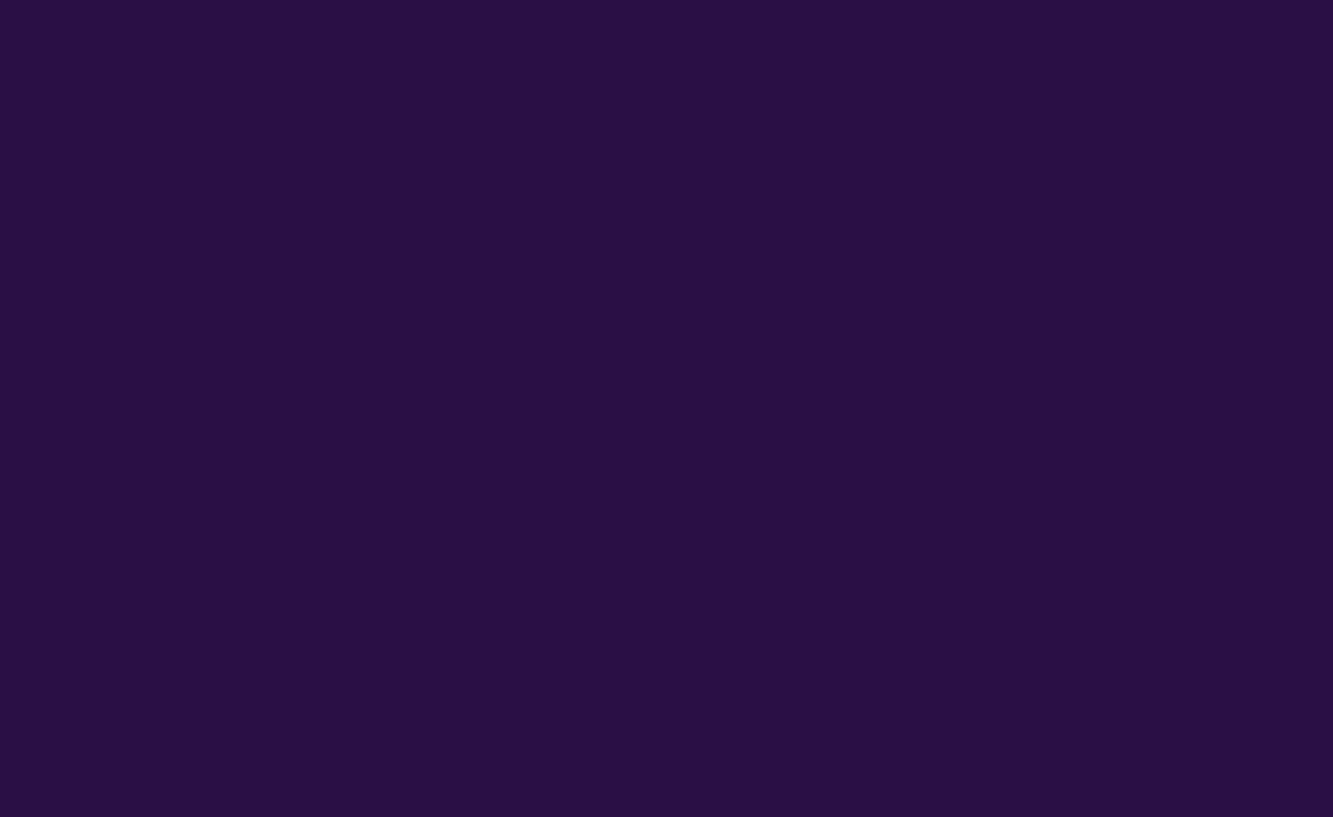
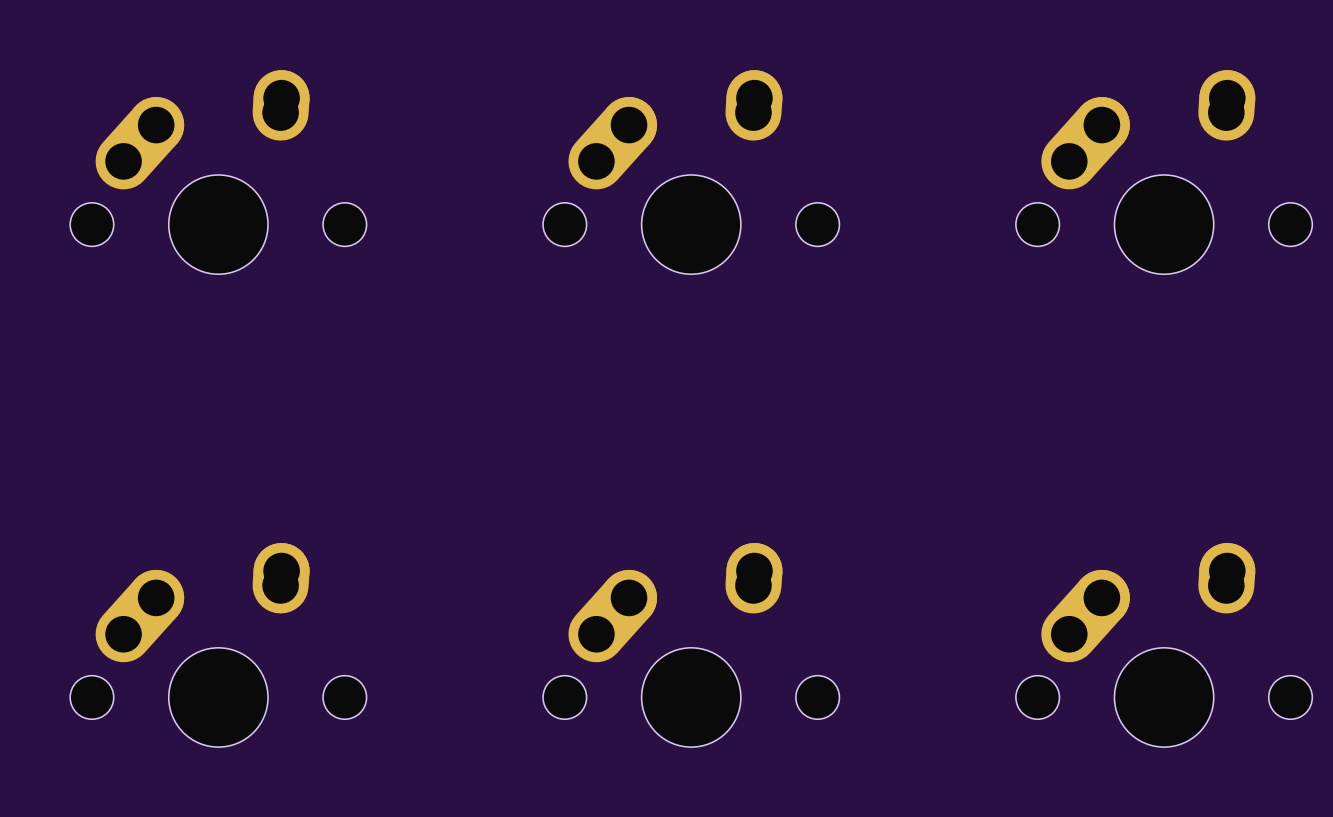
part: none -> (218, 172)
part: none -> (691, 172)
part: none -> (1164, 172)
part: none -> (218, 645)
part: none -> (691, 645)
part: none -> (1164, 645)

